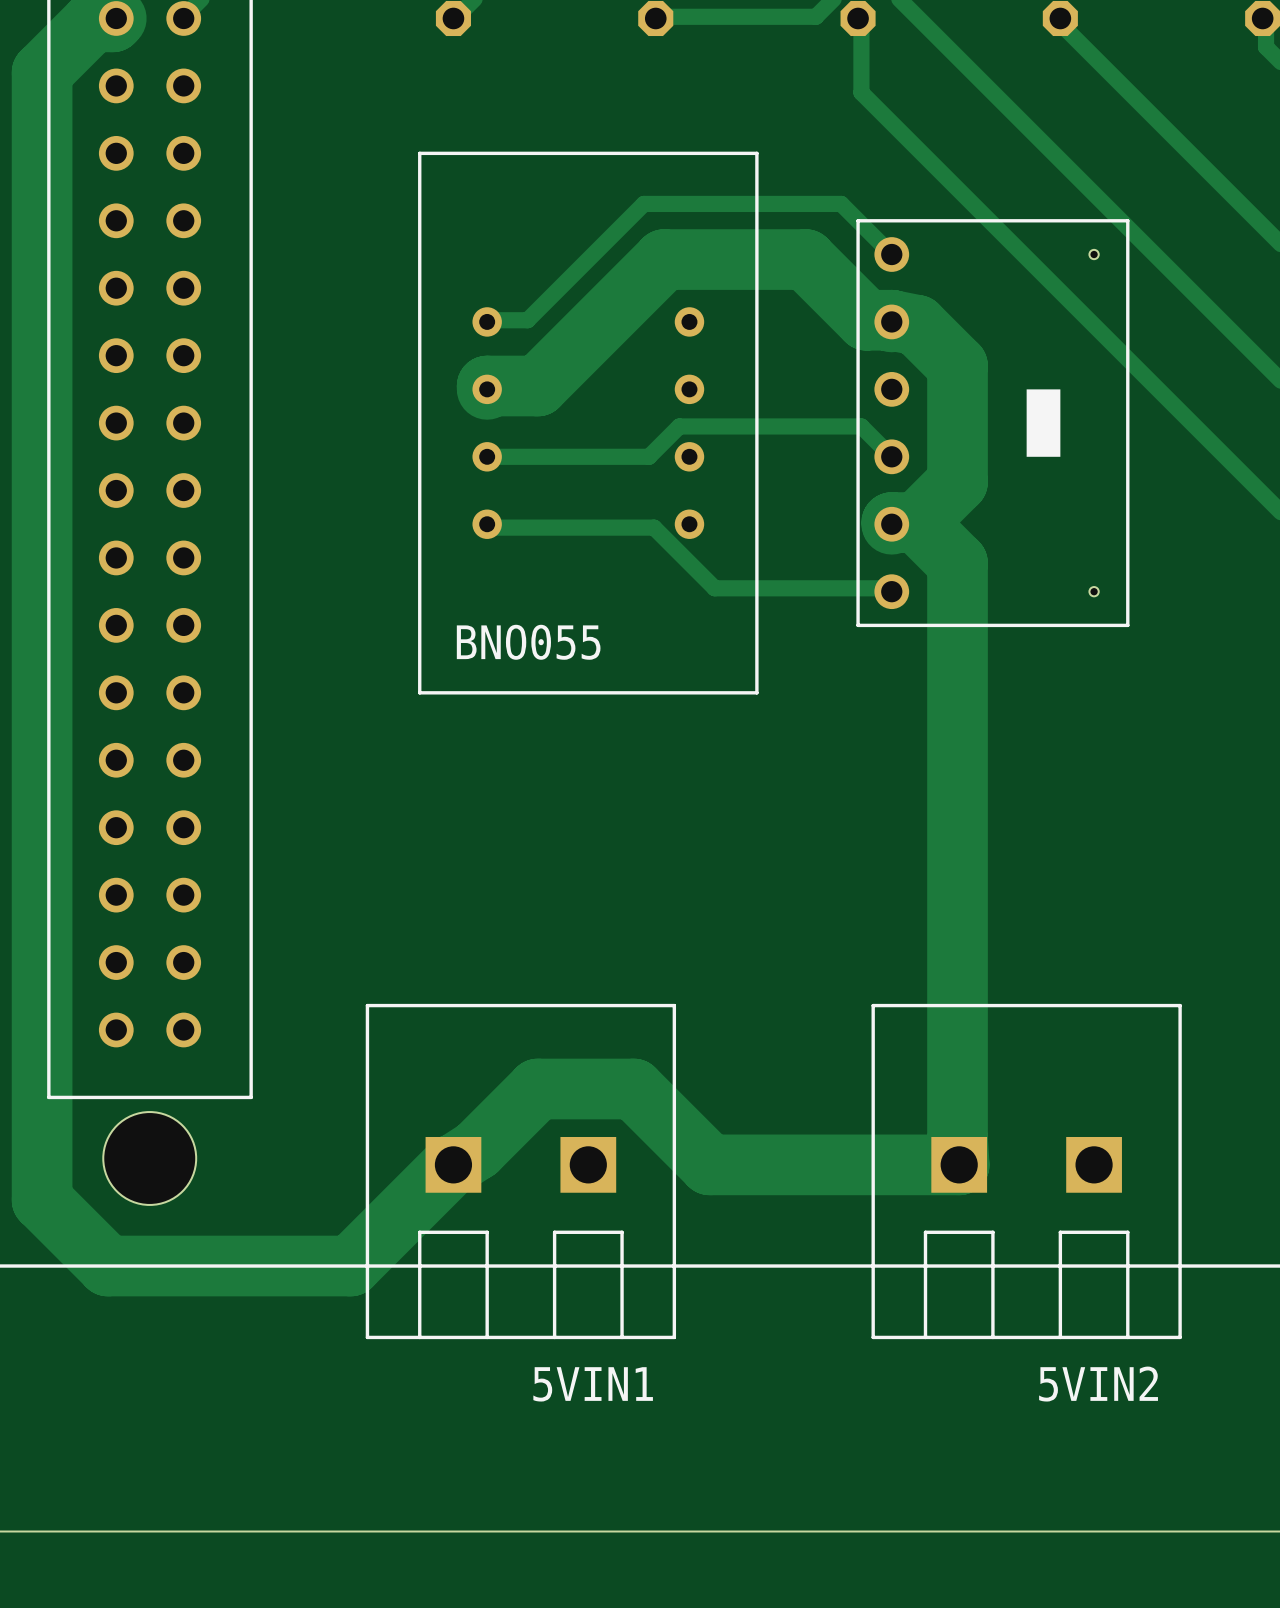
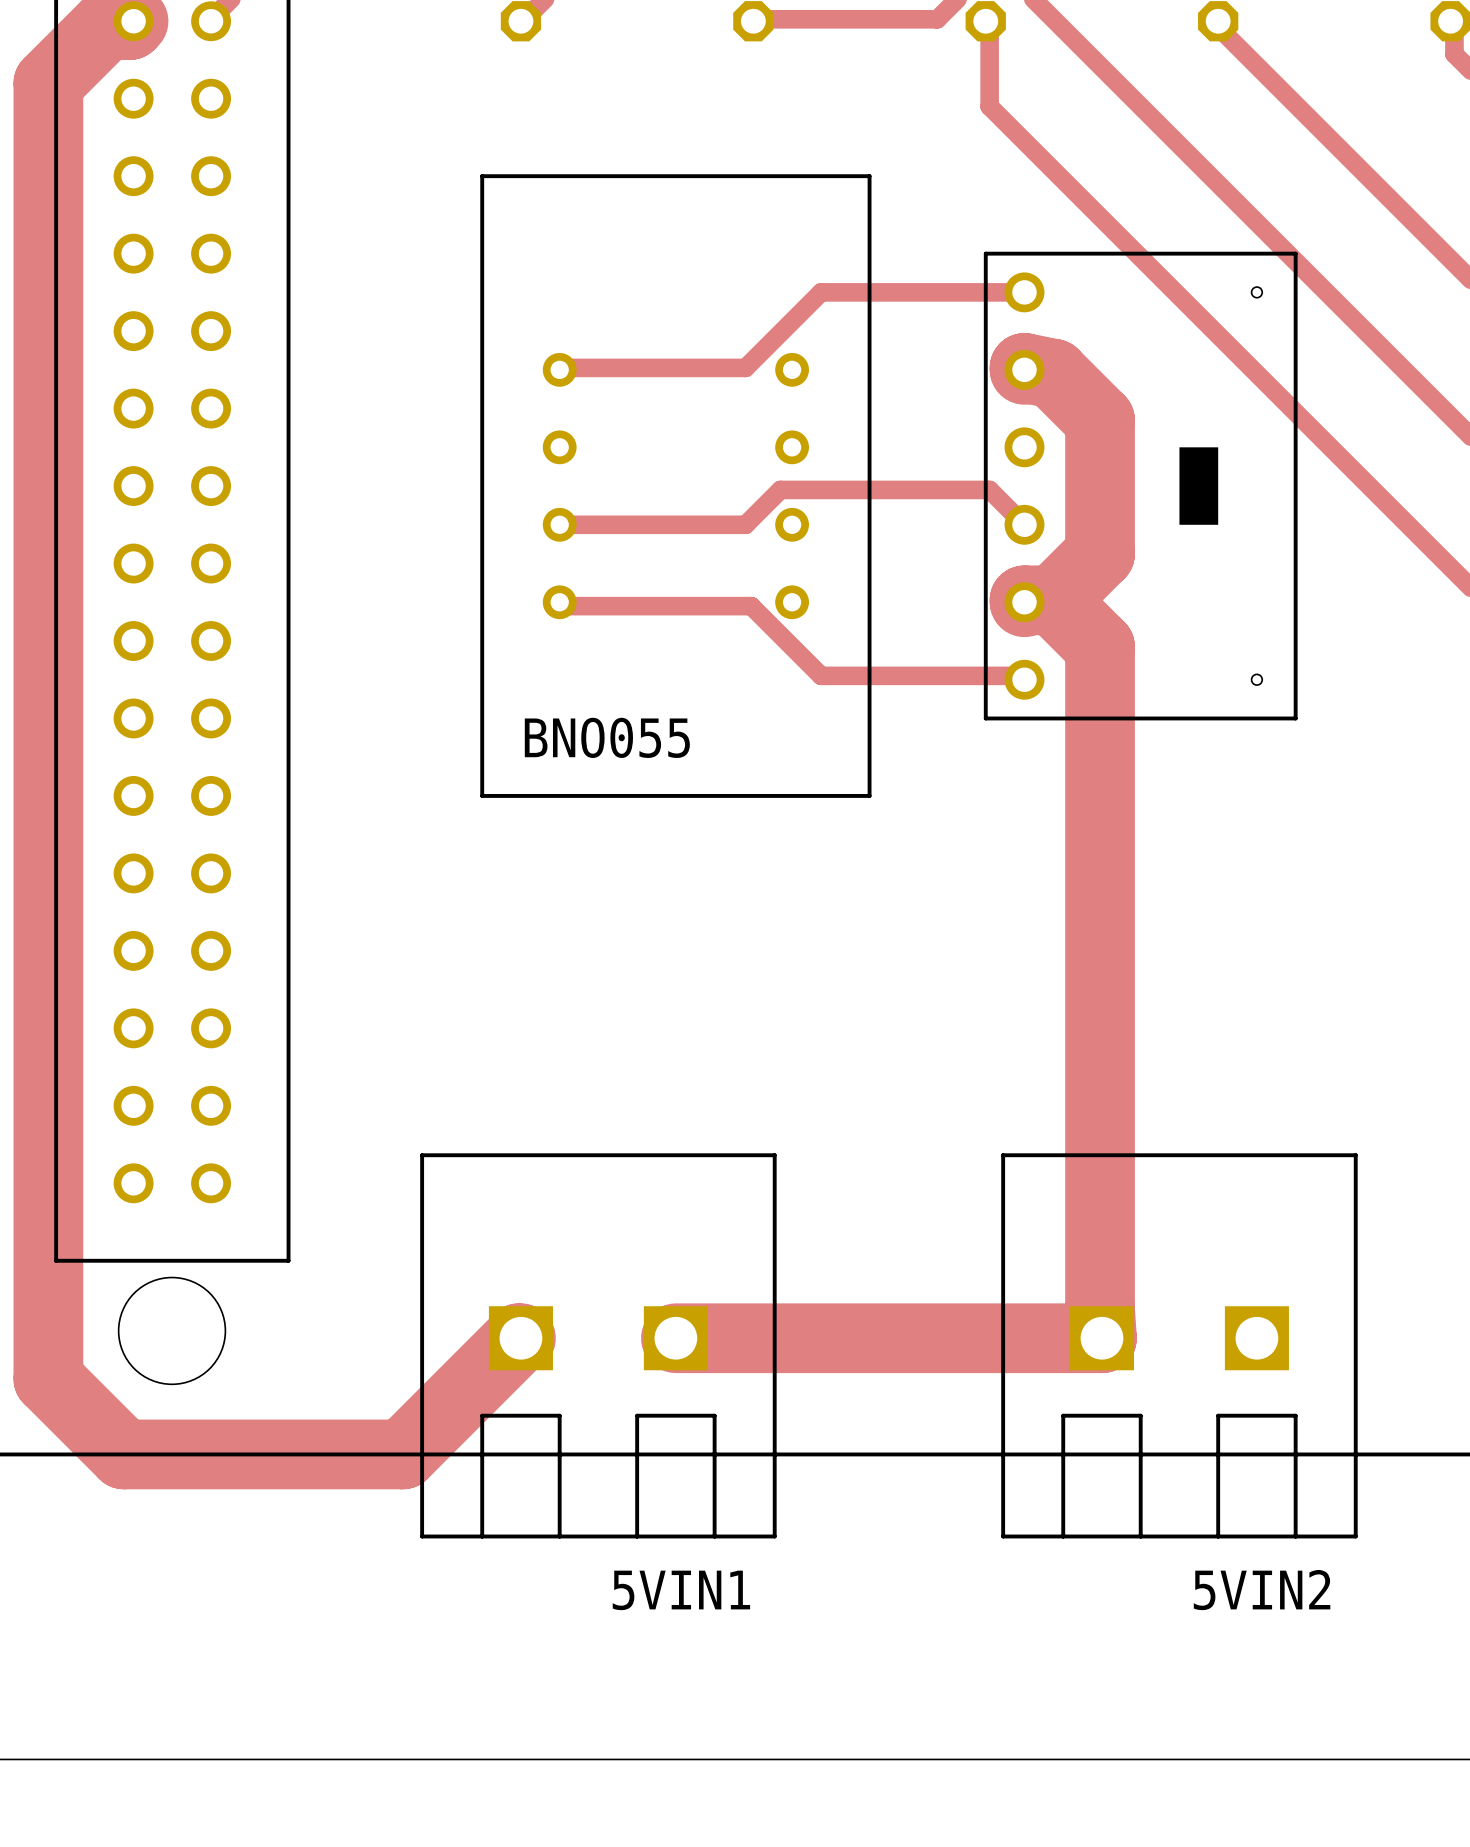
track: (891, 254) (841, 203) (643, 203) (527, 320) -> (1024, 292) (821, 292) (745, 367) (606, 367)
track: (891, 320) (866, 320) (805, 259) (664, 259) (537, 386) (487, 386) (487, 389) -> none
track: (453, 1164) (477, 1149) (537, 1089) (633, 1089) (709, 1164) -> (675, 1338) (815, 1338)

